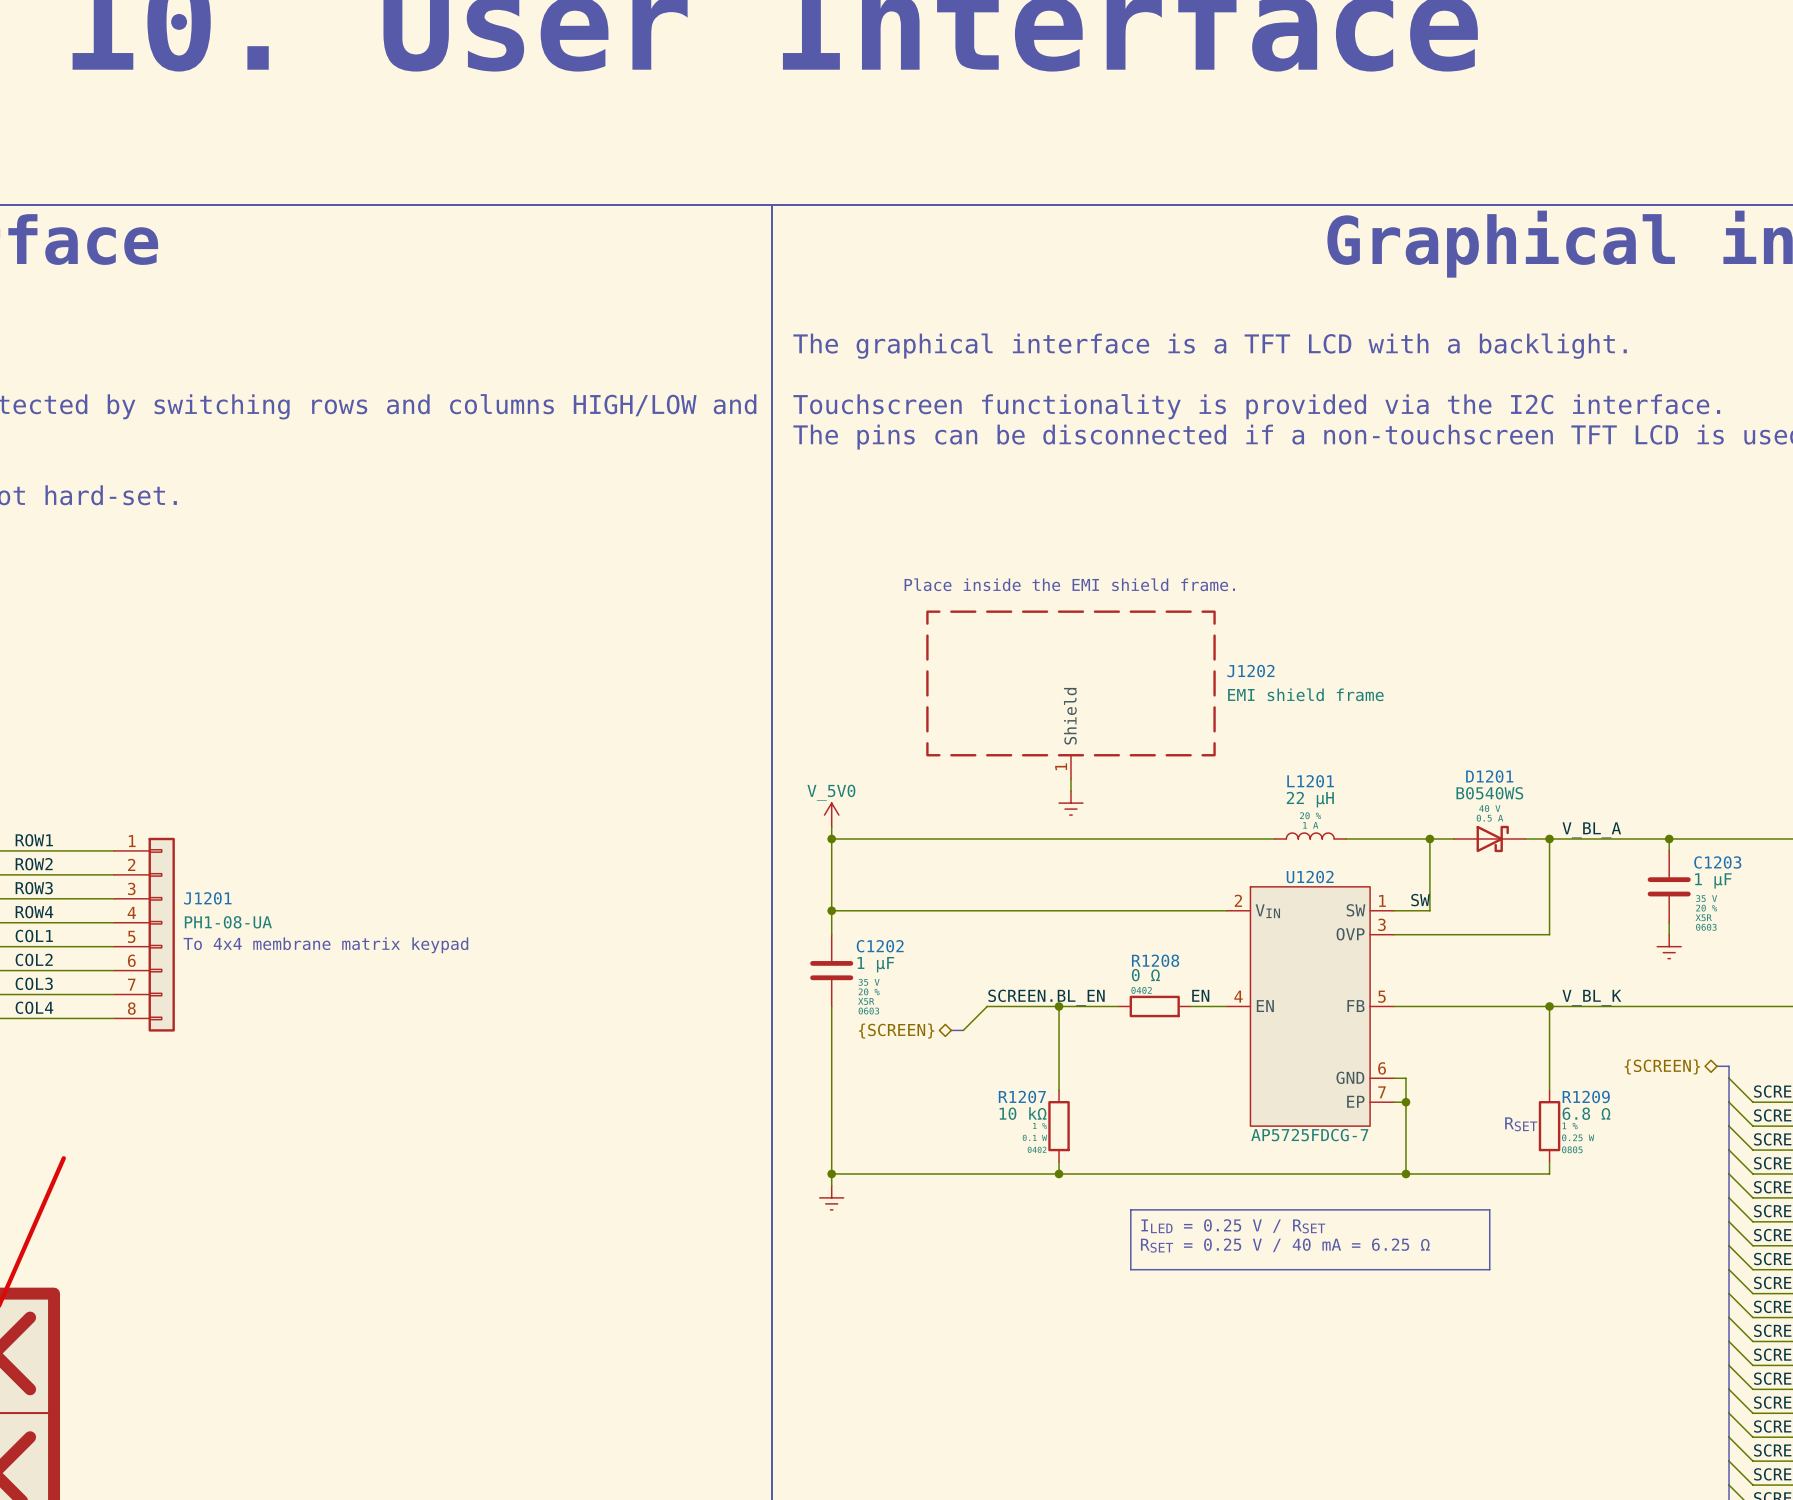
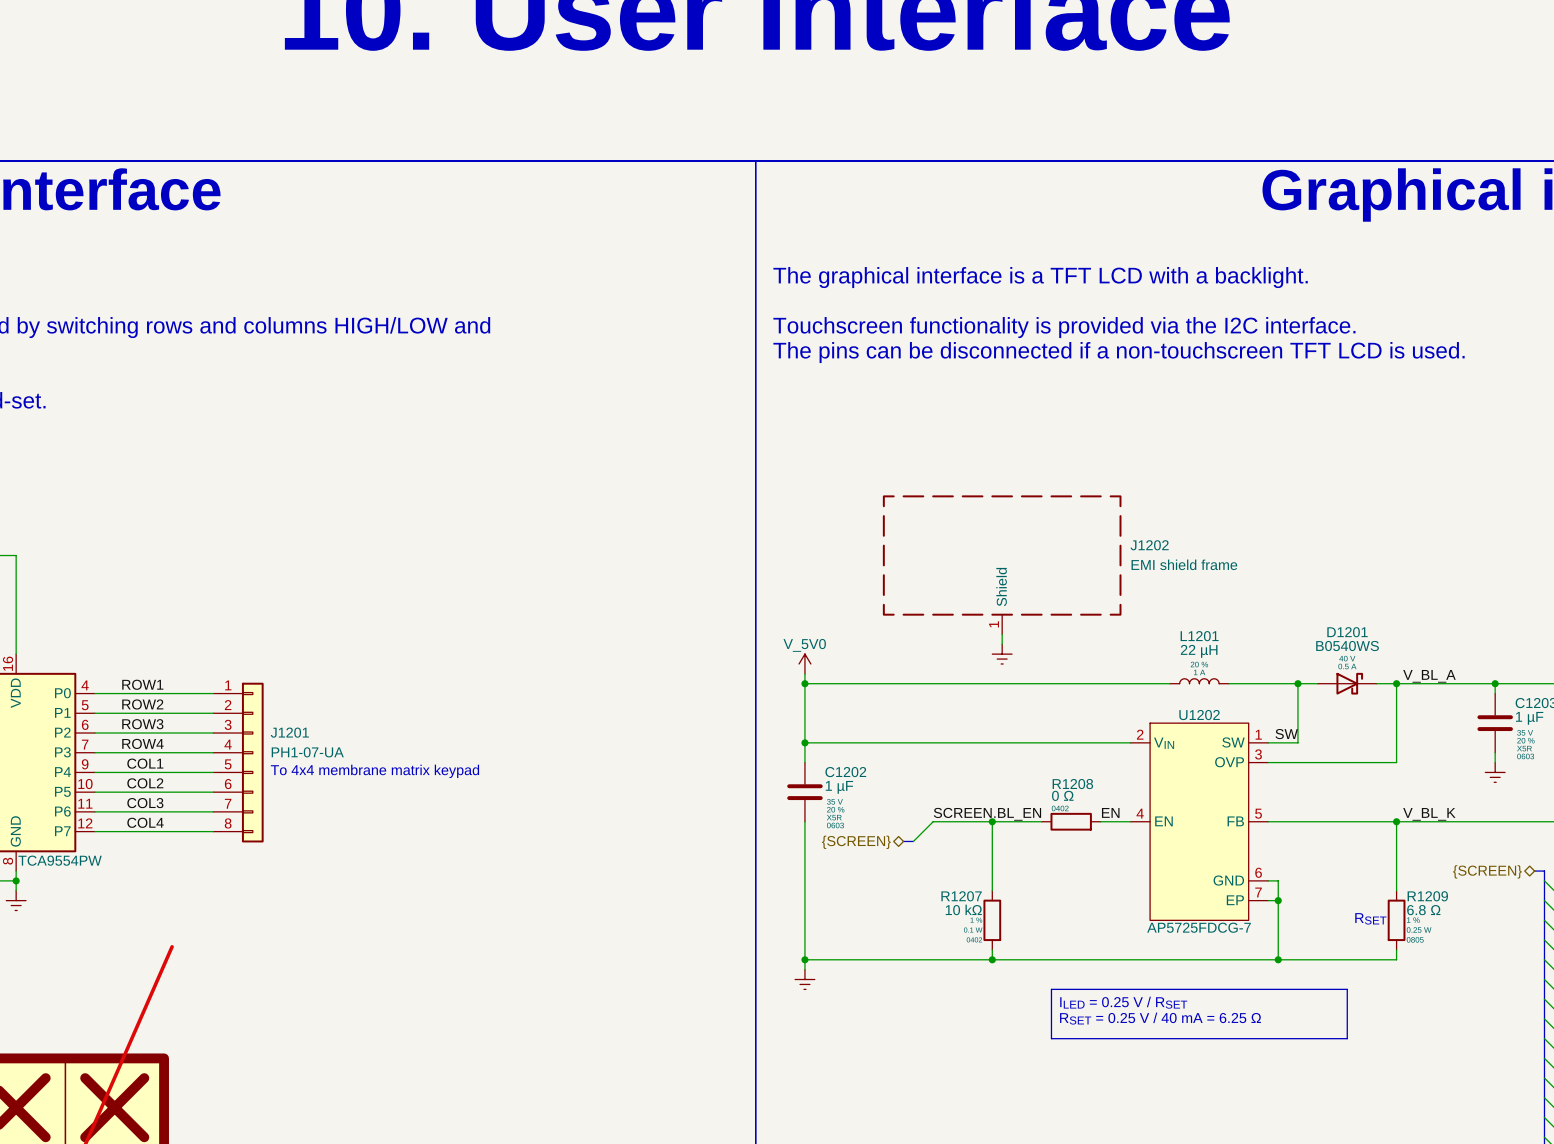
text: Place inside the EMI shield frame. (1069, 584) -> none
J1201 value: PH1-08-UA (228, 922) -> PH1-07-UA (307, 752)

